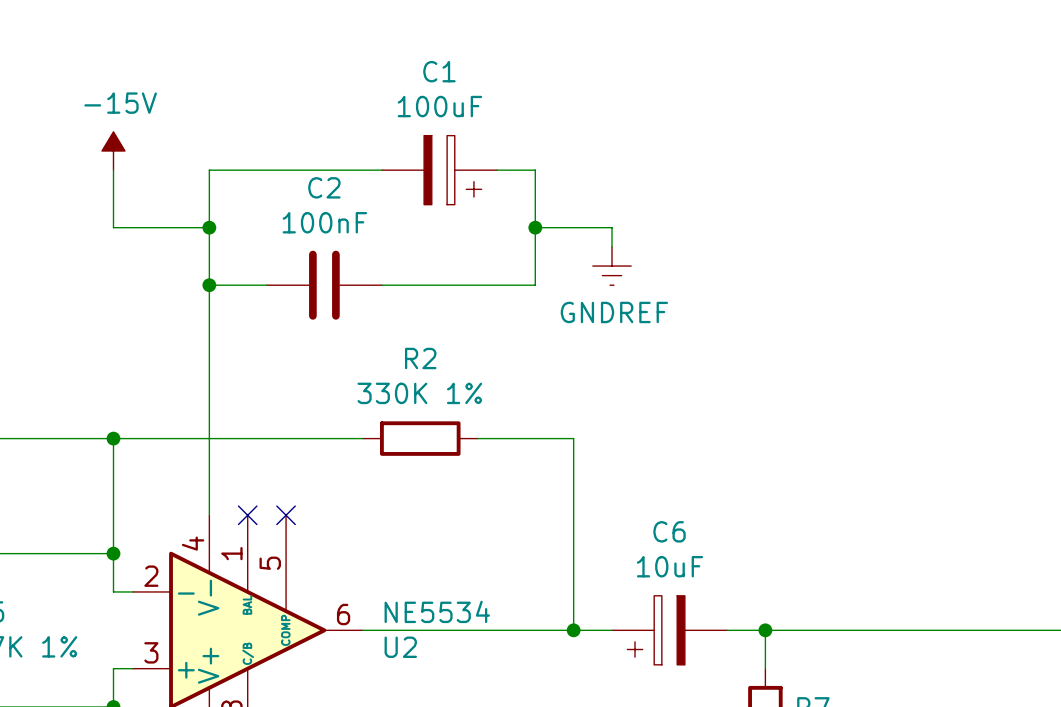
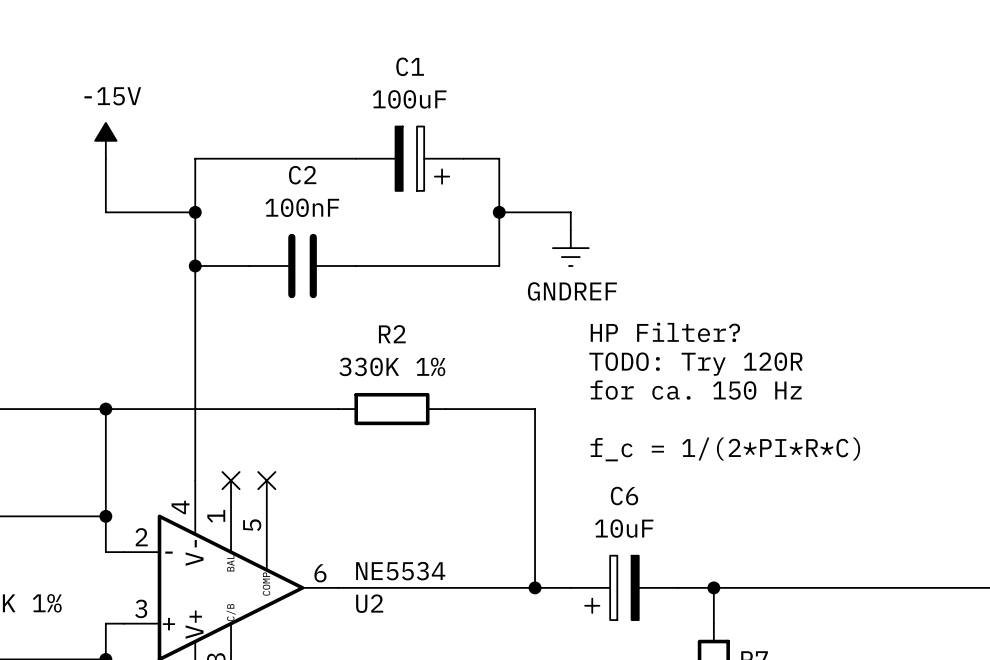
text: none -> HP Filter? (665, 332)
text: none -> TODO: Try 120R (695, 364)
text: none -> for ca. 150 Hz (696, 390)
text: none -> f_c = 1/(2*PI*R*C) (725, 449)

